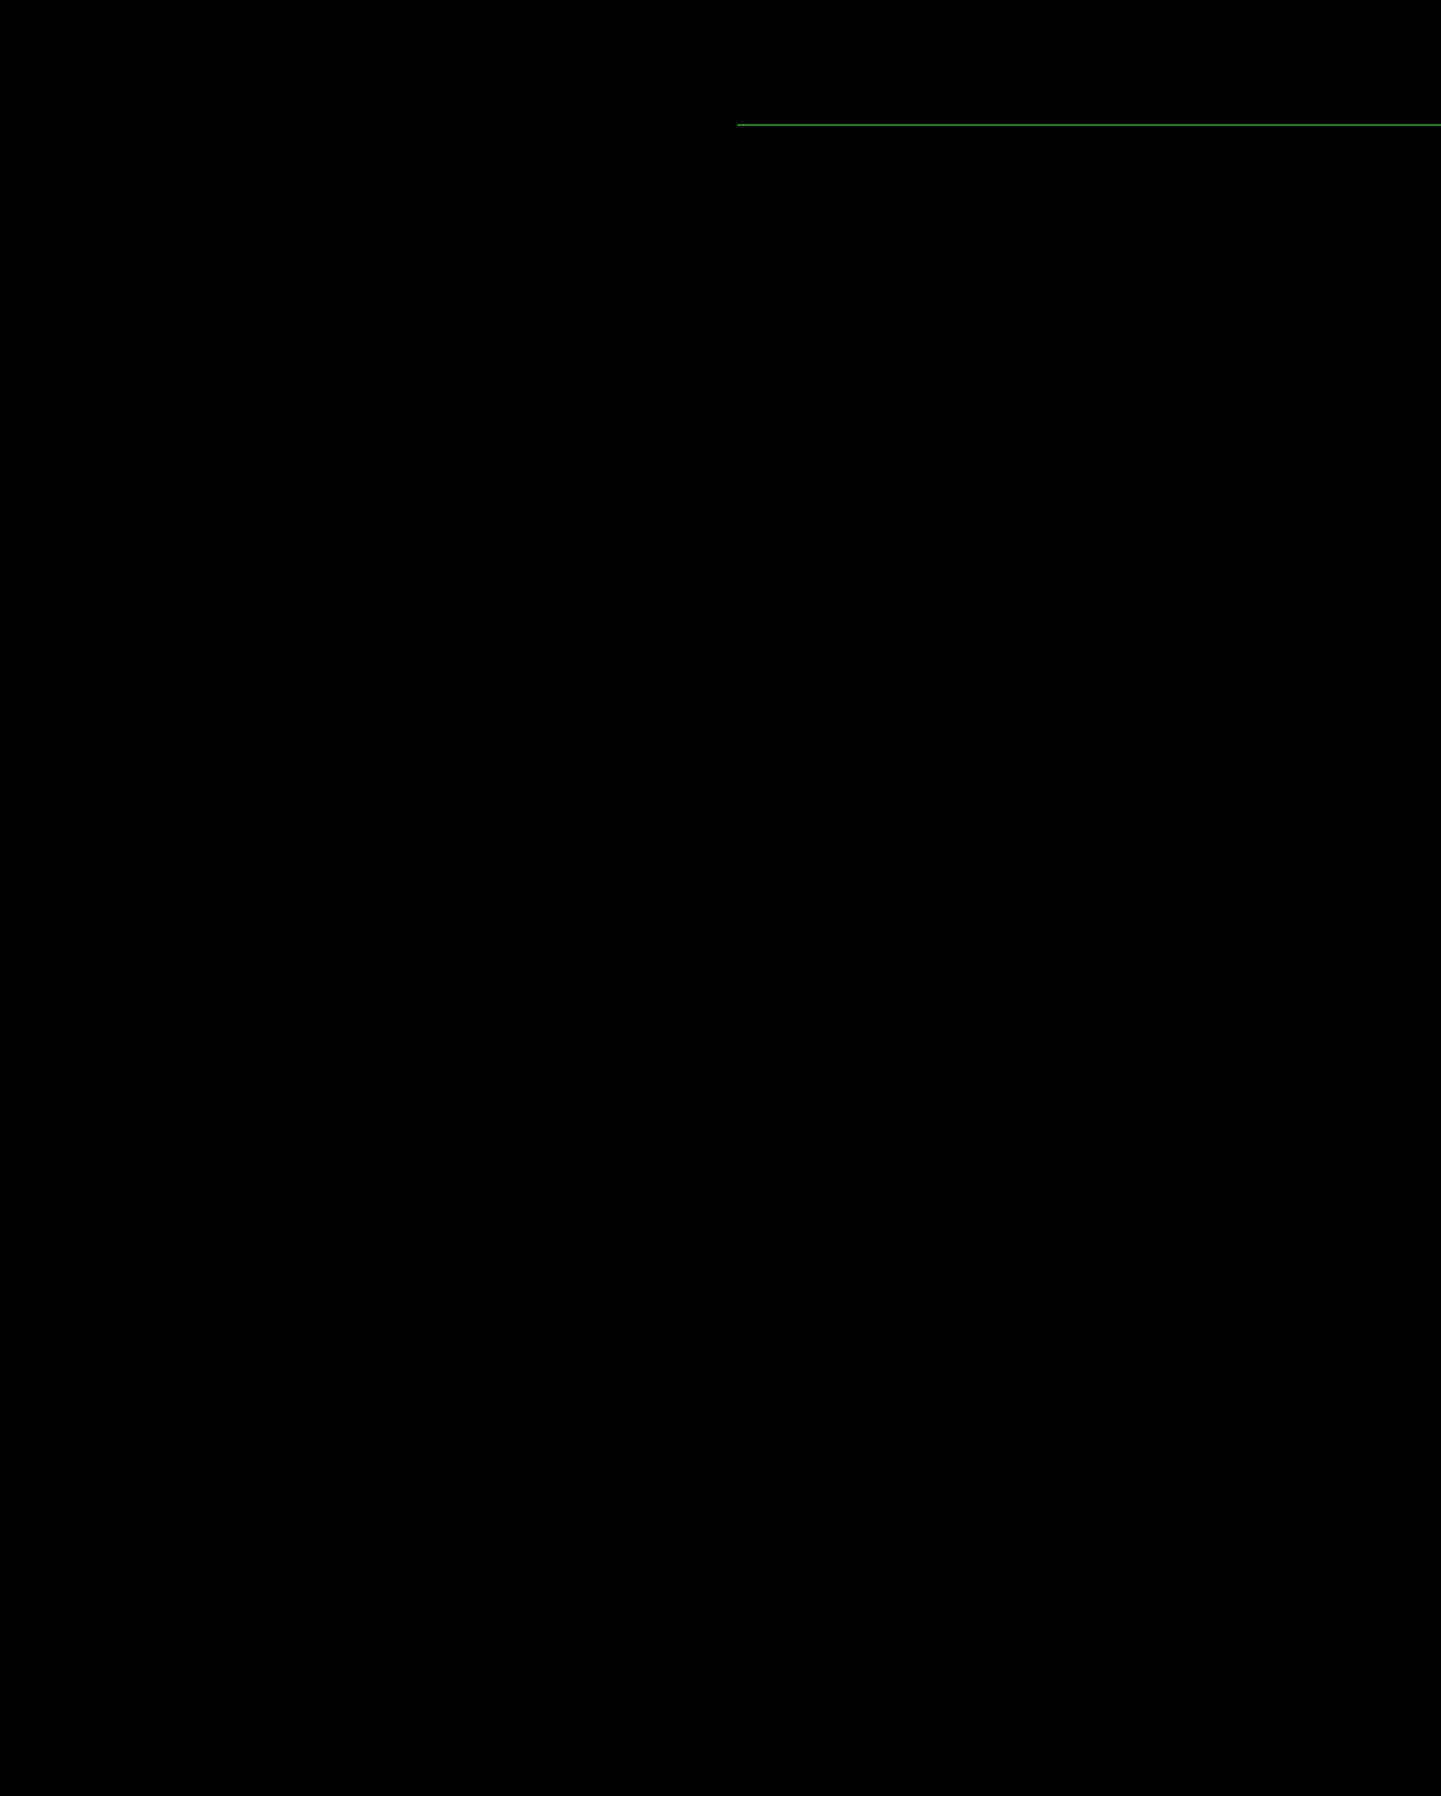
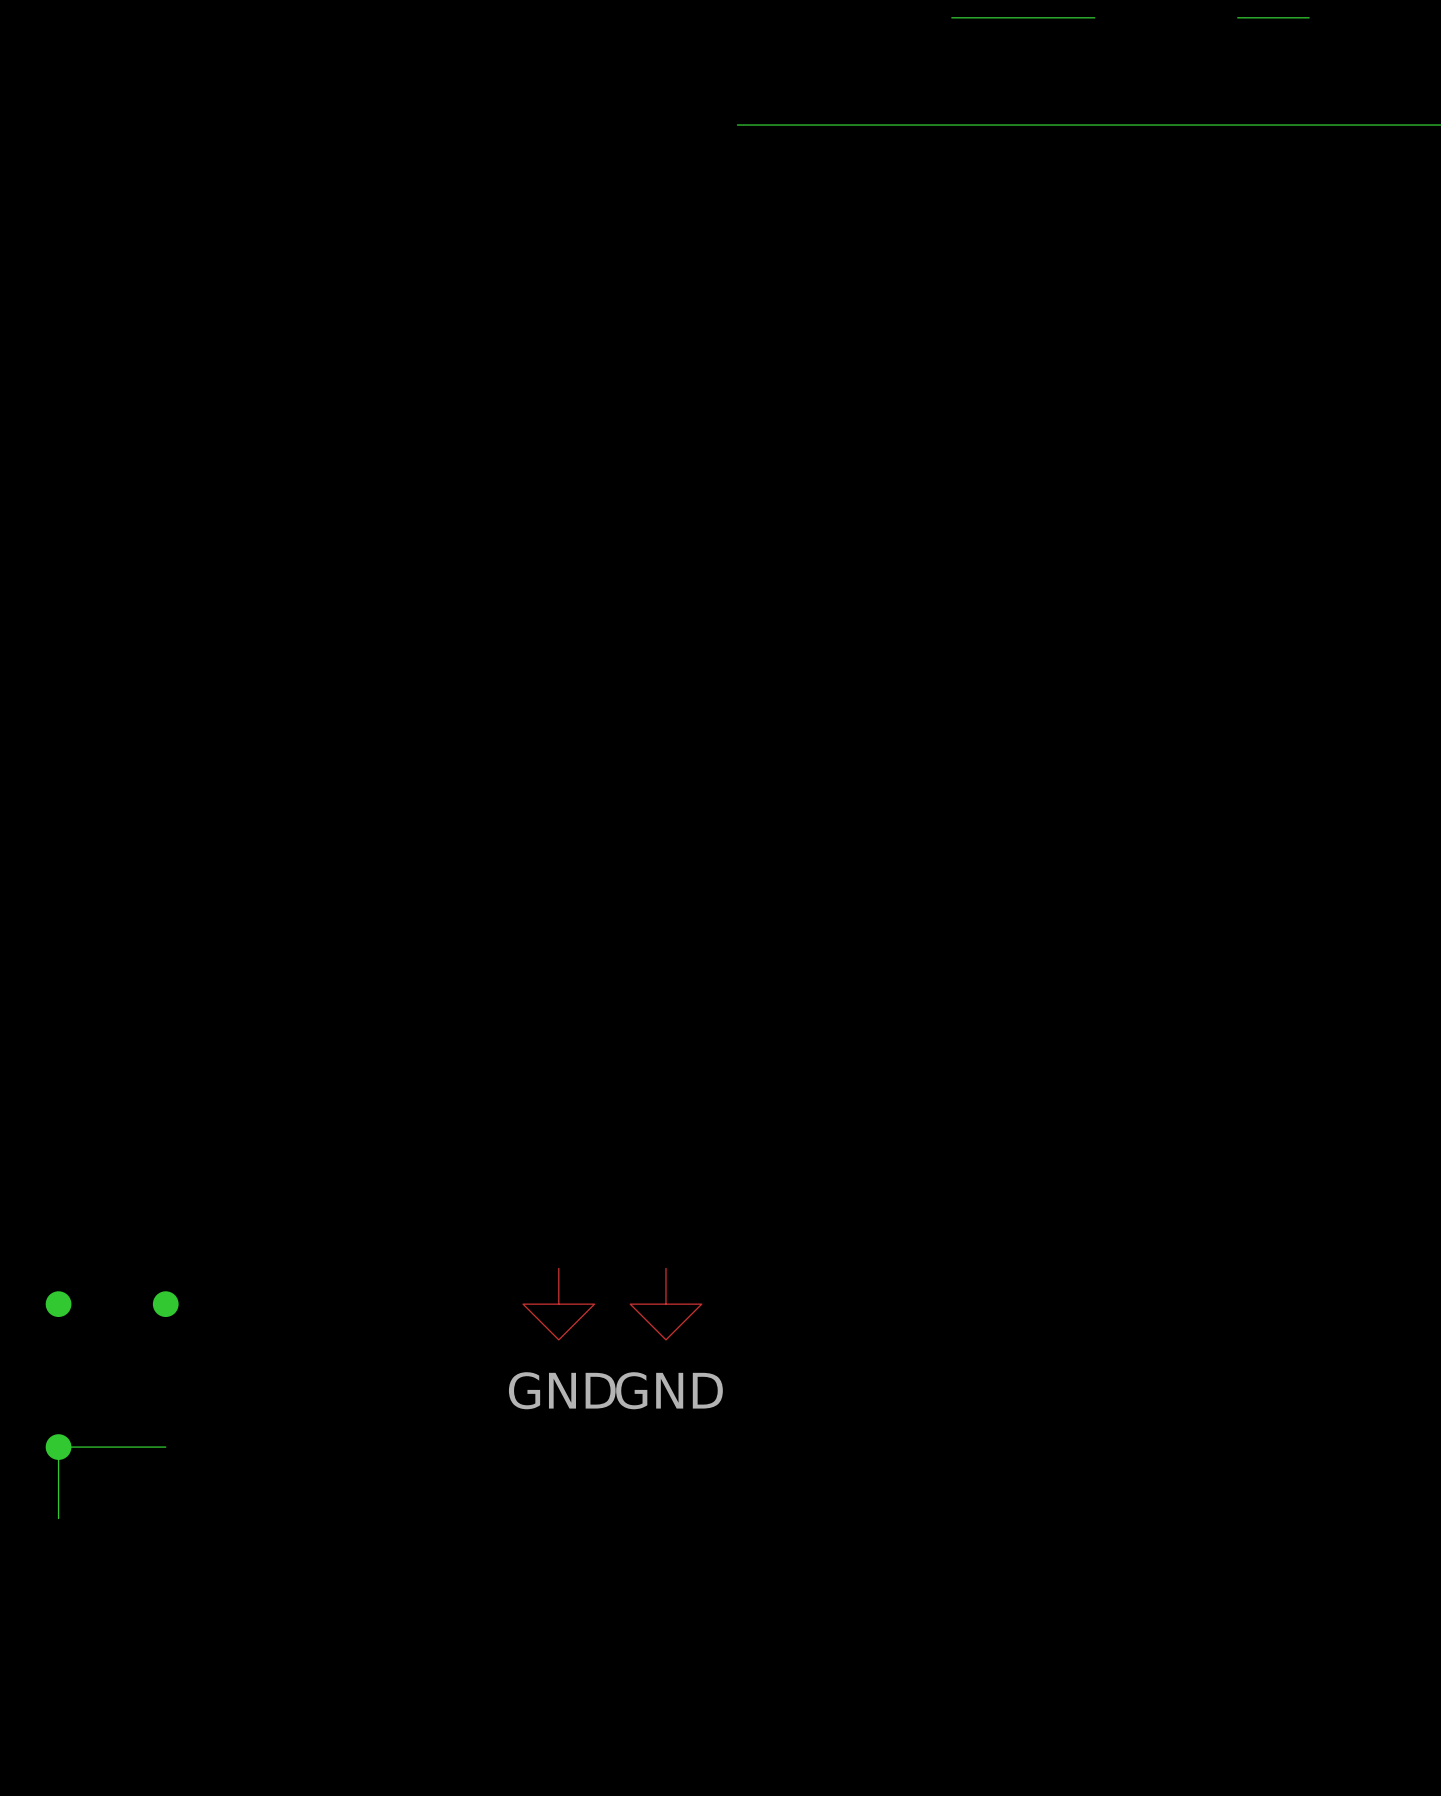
wire: none -> (951, 17) (1094, 17)
wire: none -> (1237, 17) (1309, 17)
junction: none -> (58, 1304)
junction: none -> (165, 1304)
power symbol: none -> GND (558, 1304)
power symbol: none -> GND (665, 1304)
junction: none -> (58, 1447)
wire: none -> (165, 1447) (58, 1447) (58, 1518)

